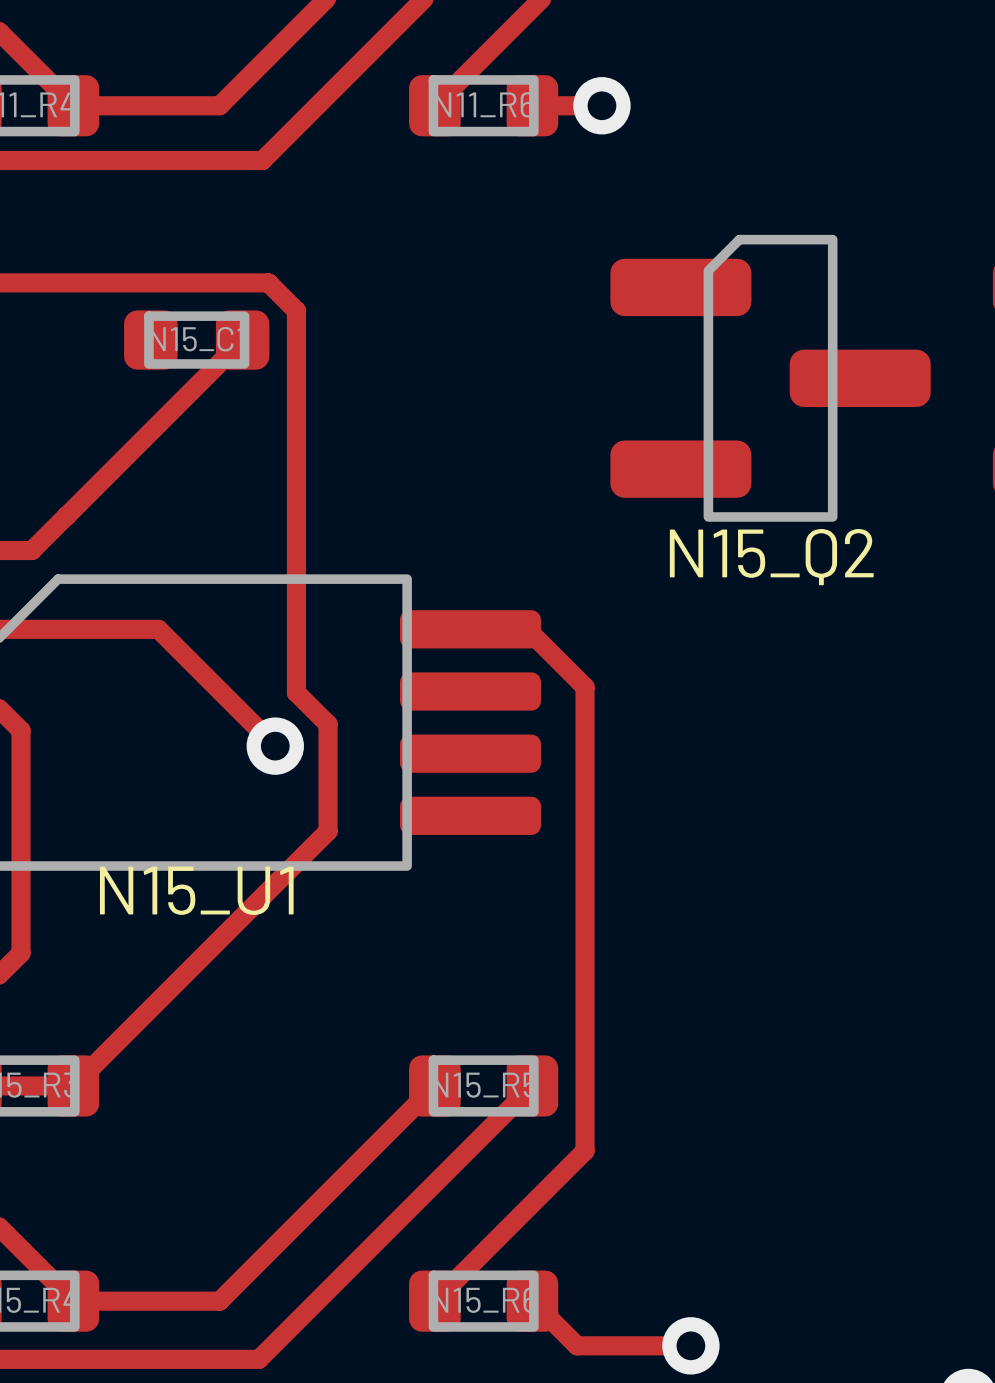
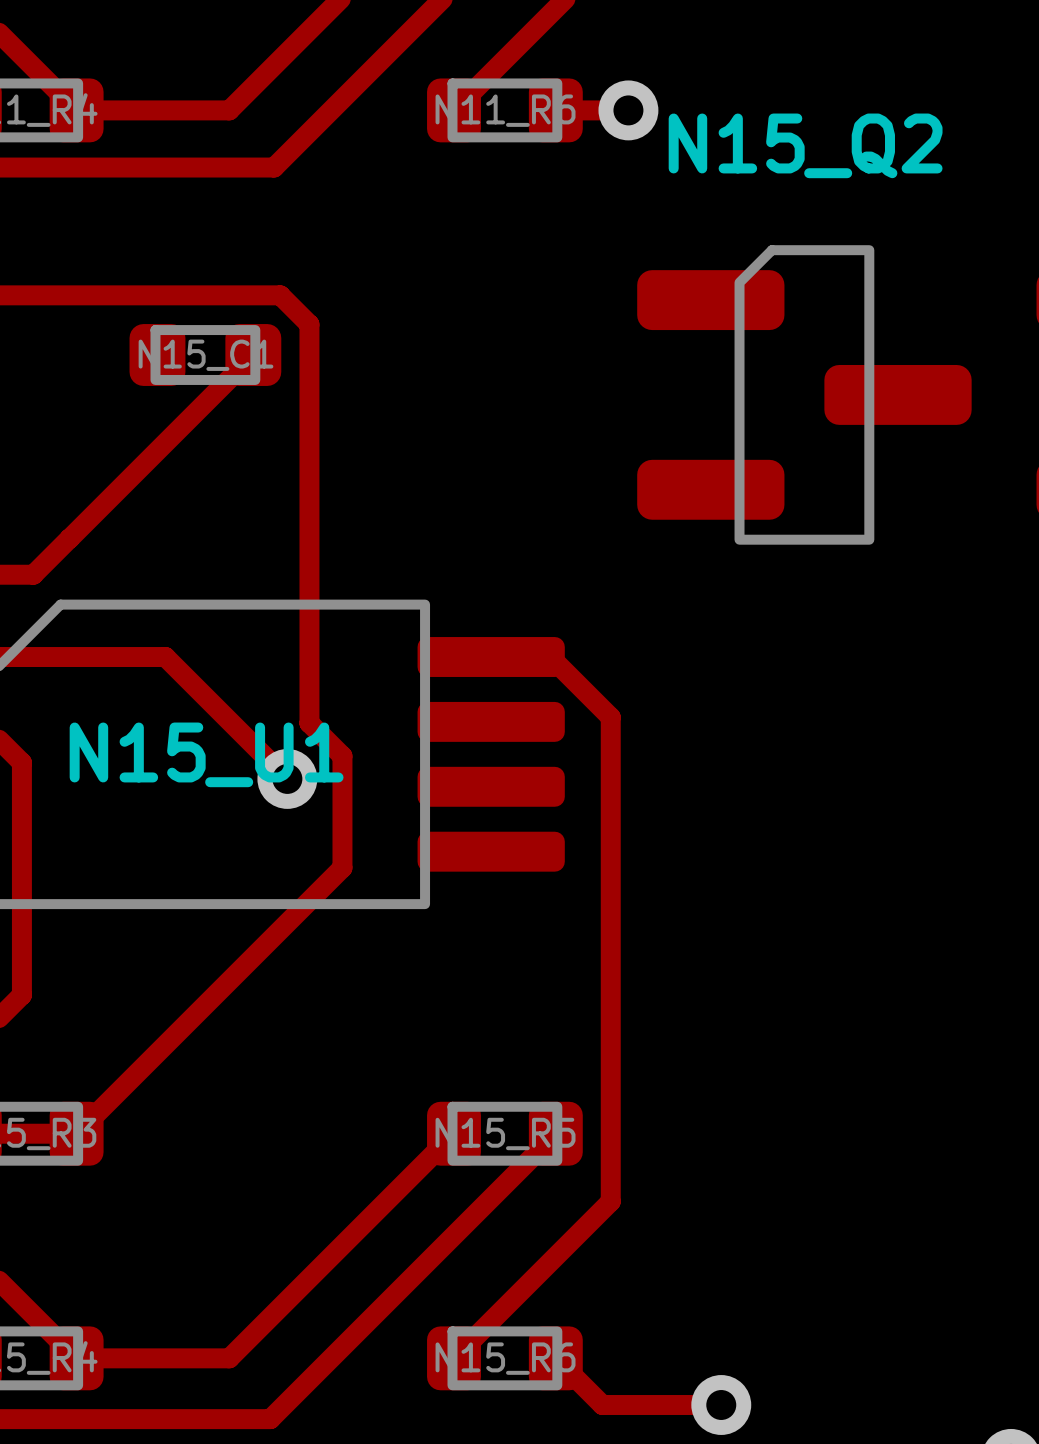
N15_Q2 name position: N15_Q2 (771, 557) -> N15_Q2 (805, 145)
N15_U1 name position: N15_U1 (196, 890) -> N15_U1 (206, 754)

